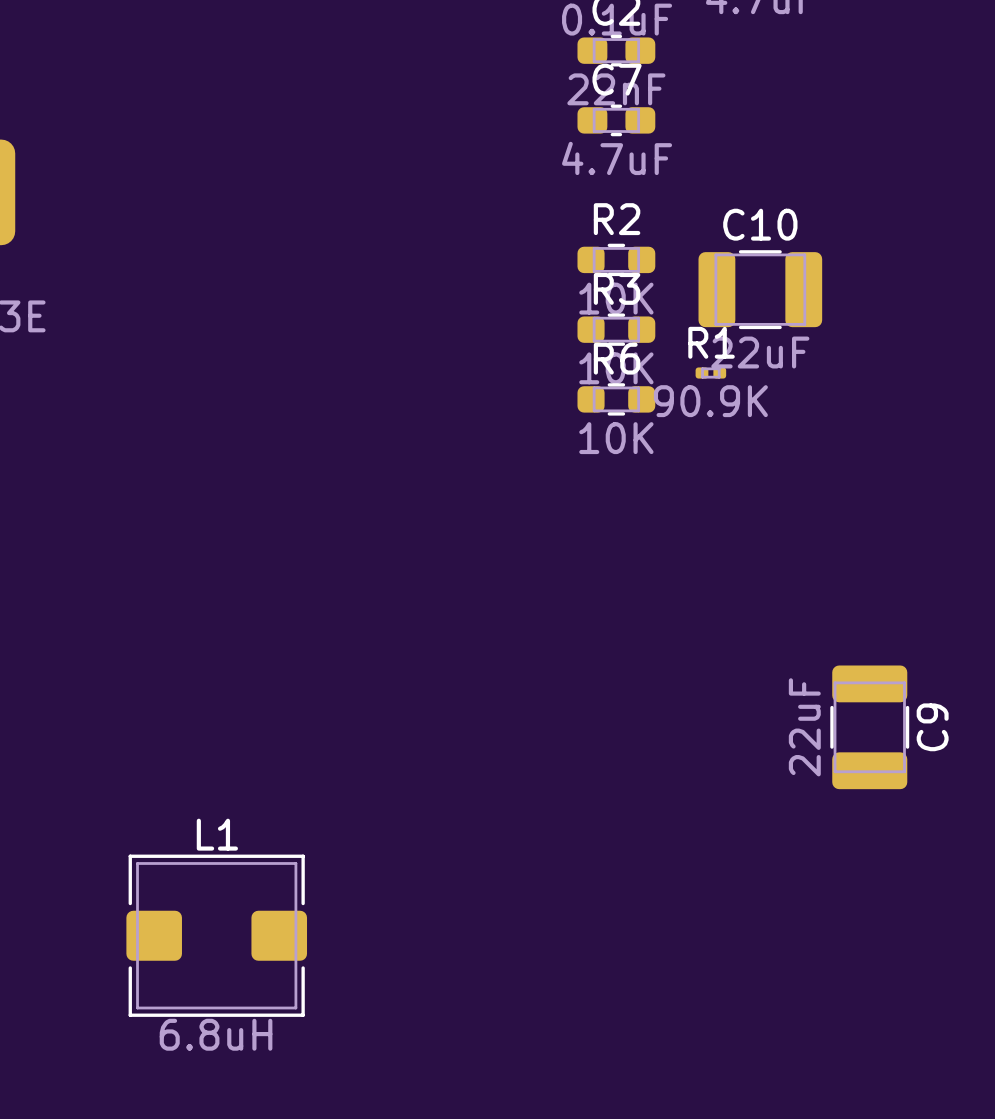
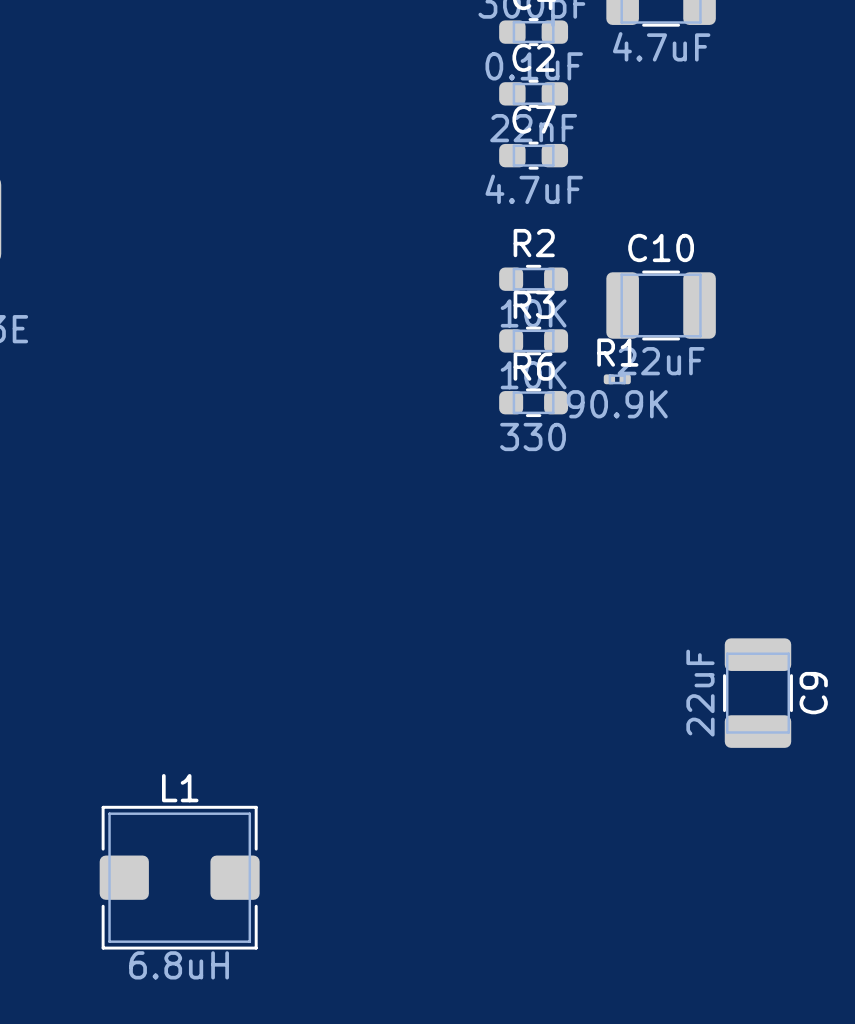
R6 value: 10K (616, 438) -> 330 (533, 436)

